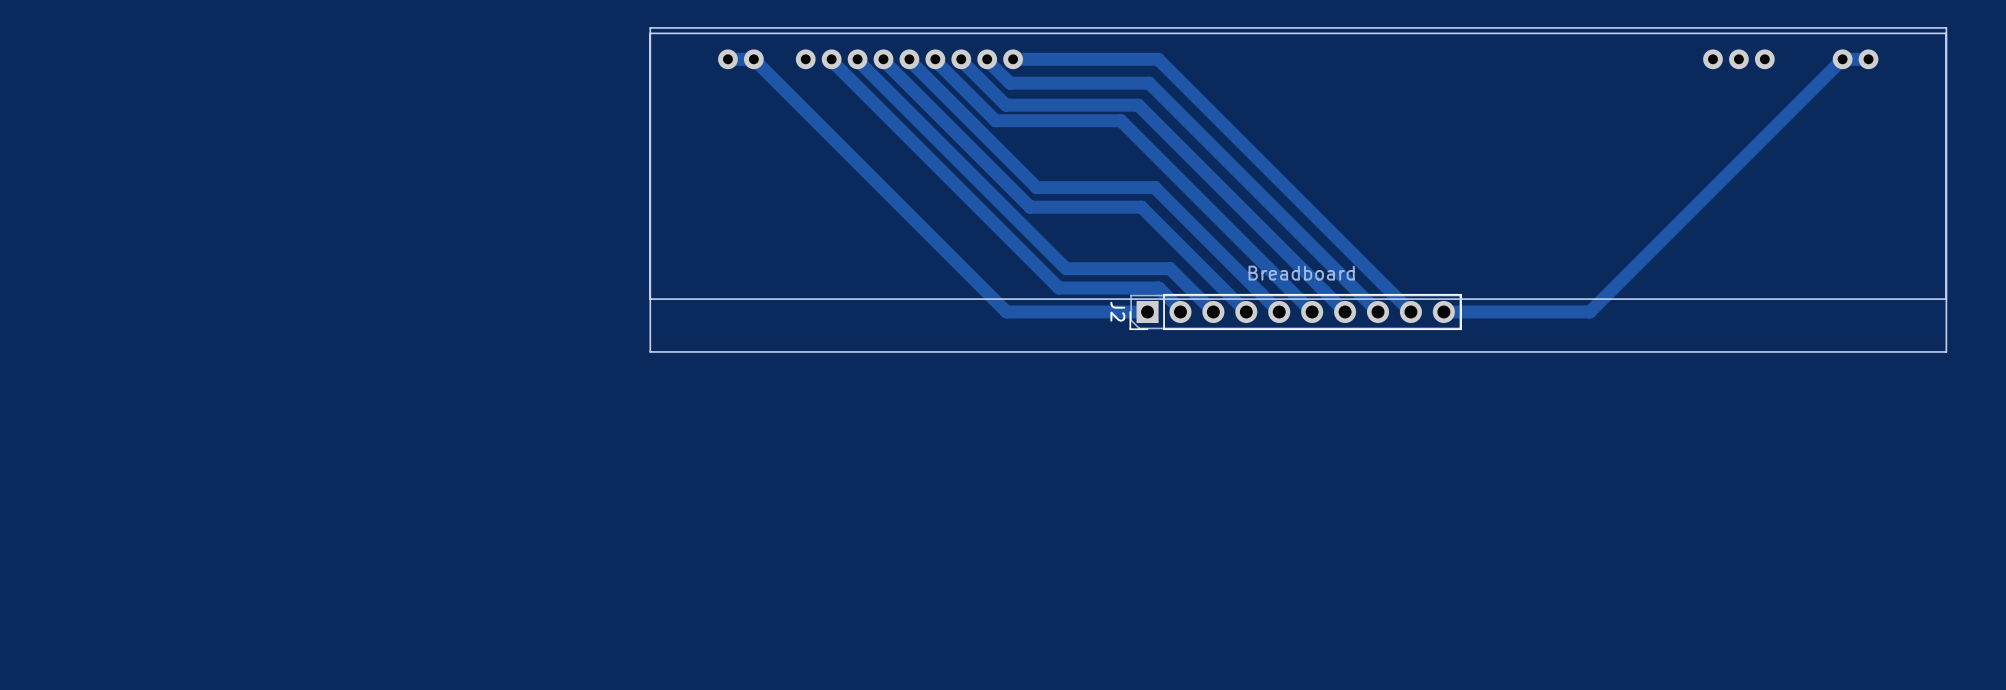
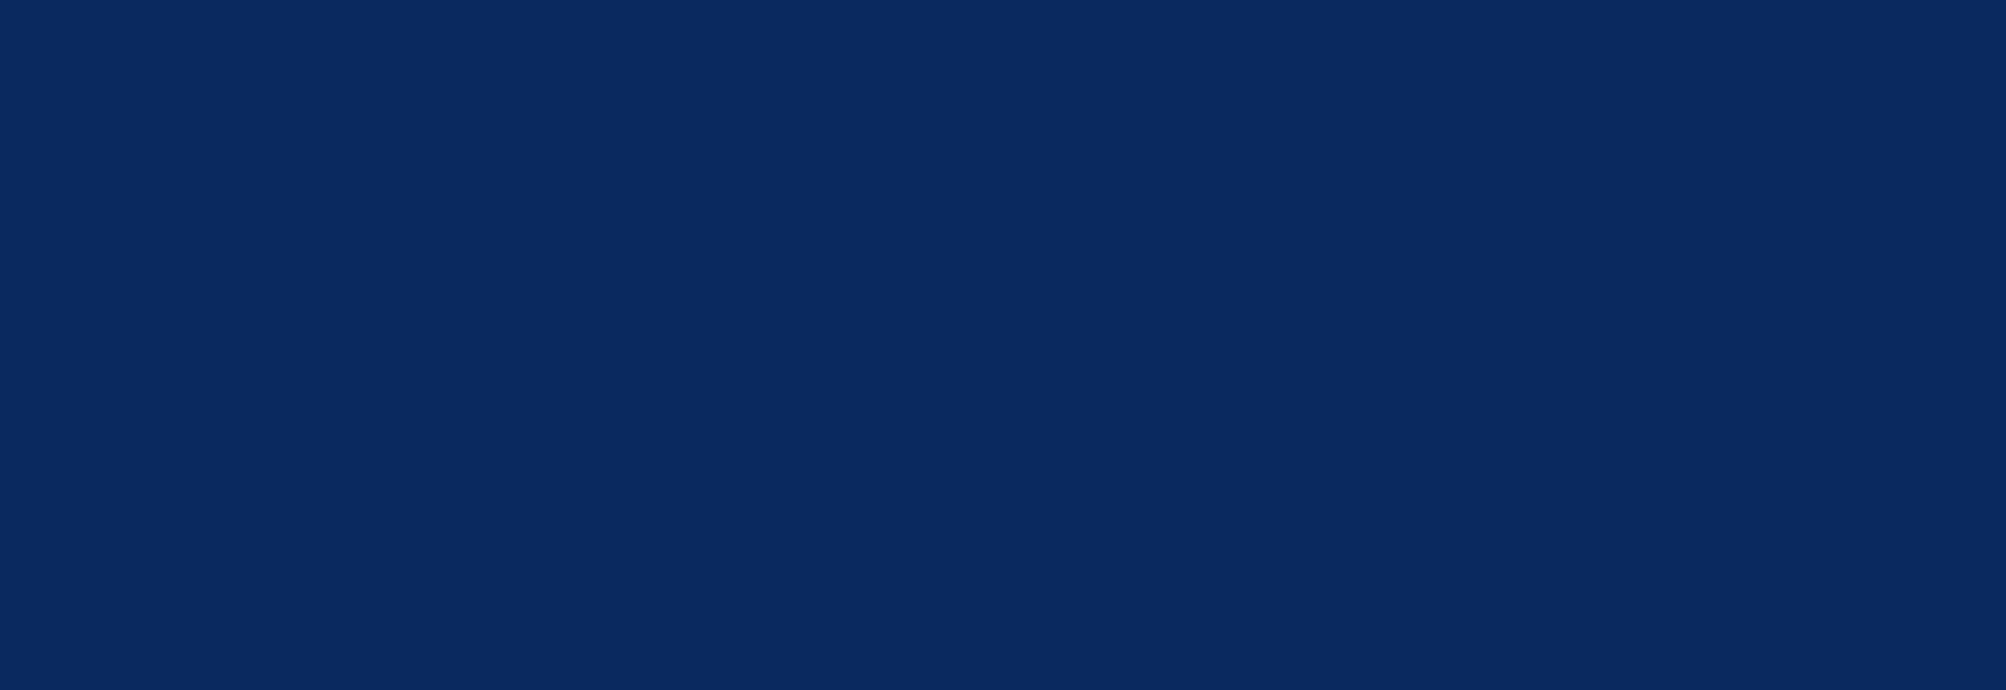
board edge: (1946, 27) (1946, 351) (650, 351) (650, 27) (1946, 27) -> none
track: (727, 59) (753, 59) (1006, 311) (1147, 311) -> none
track: (831, 59) (1058, 288) (1158, 288) (1180, 309) (1180, 311) -> none
track: (857, 59) (1065, 268) (1170, 268) (1213, 311) -> none
track: (883, 59) (1030, 207) (1141, 207) (1246, 311) -> none
track: (909, 59) (1036, 187) (1154, 187) (1279, 311) -> none
track: (935, 59) (995, 120) (1120, 120) (1312, 311) -> none
track: (961, 59) (1005, 105) (1138, 105) (1345, 311) -> none
track: (987, 59) (1009, 83) (1149, 83) (1378, 311) -> none
track: (1013, 59) (1158, 59) (1410, 311) -> none
track: (1868, 59) (1842, 59) (1589, 311) (1443, 311) -> none
part: (1298, 166) -> none
J2: Breadboard (1295, 311) -> none

